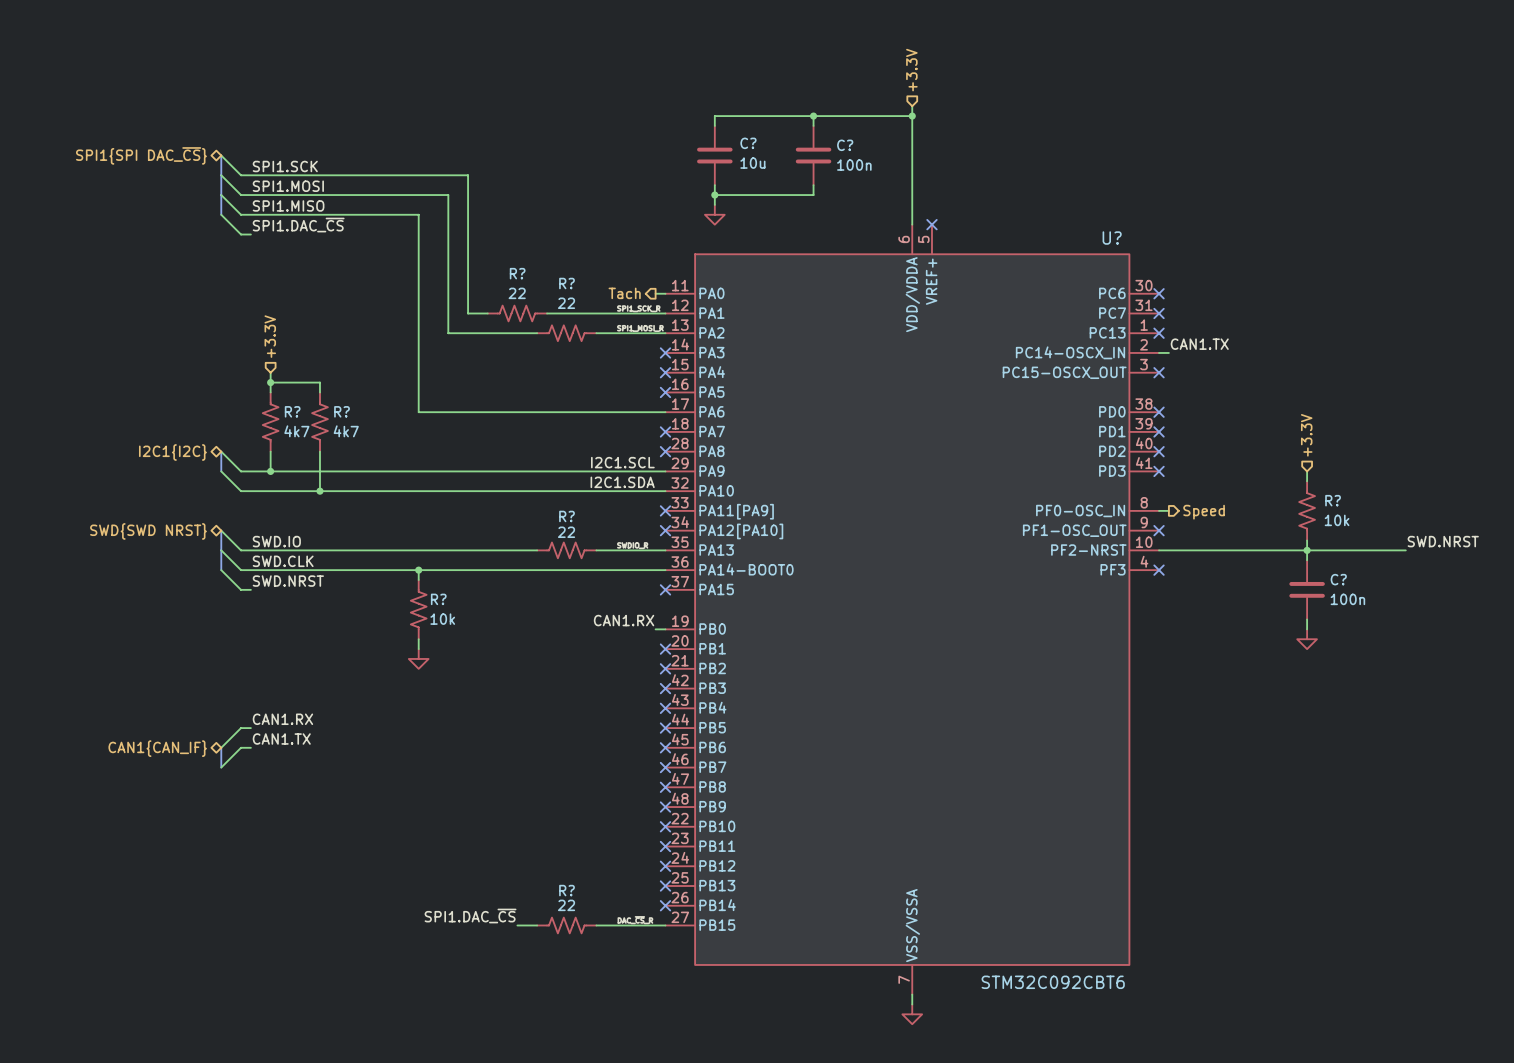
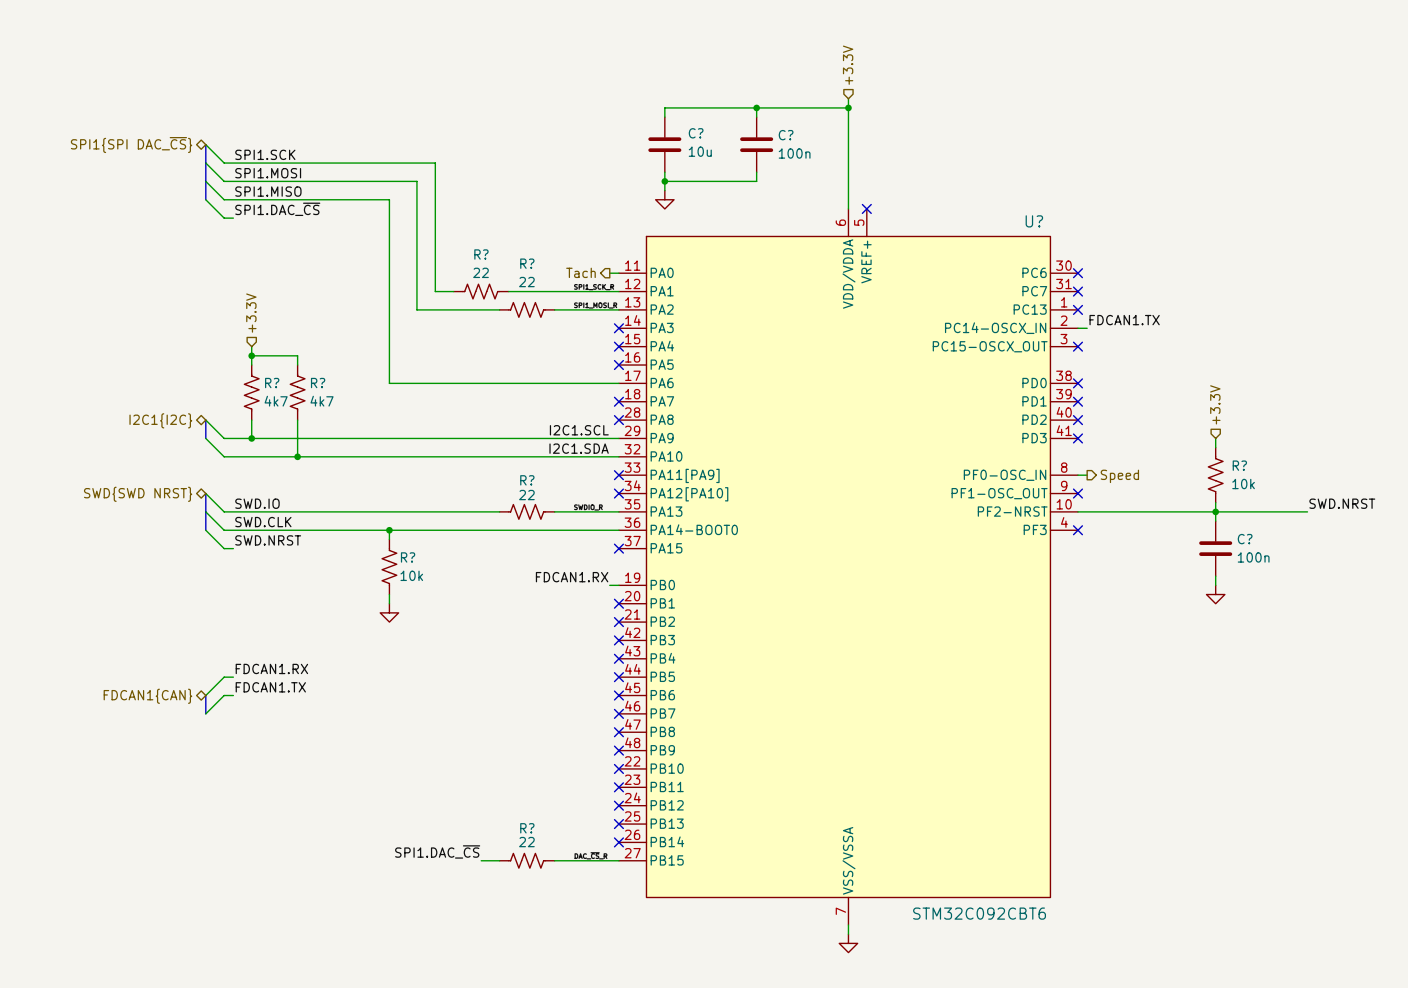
label: CAN1.TX (1199, 344) -> FDCAN1.TX (1124, 320)
label: CAN1.RX (624, 620) -> FDCAN1.RX (572, 577)
label: CAN1.RX (282, 719) -> FDCAN1.RX (271, 668)
label: CAN1.TX (281, 739) -> FDCAN1.TX (270, 687)
hierarchical label: CAN1{CAN_IF} (157, 748) -> FDCAN1{CAN} (147, 696)

